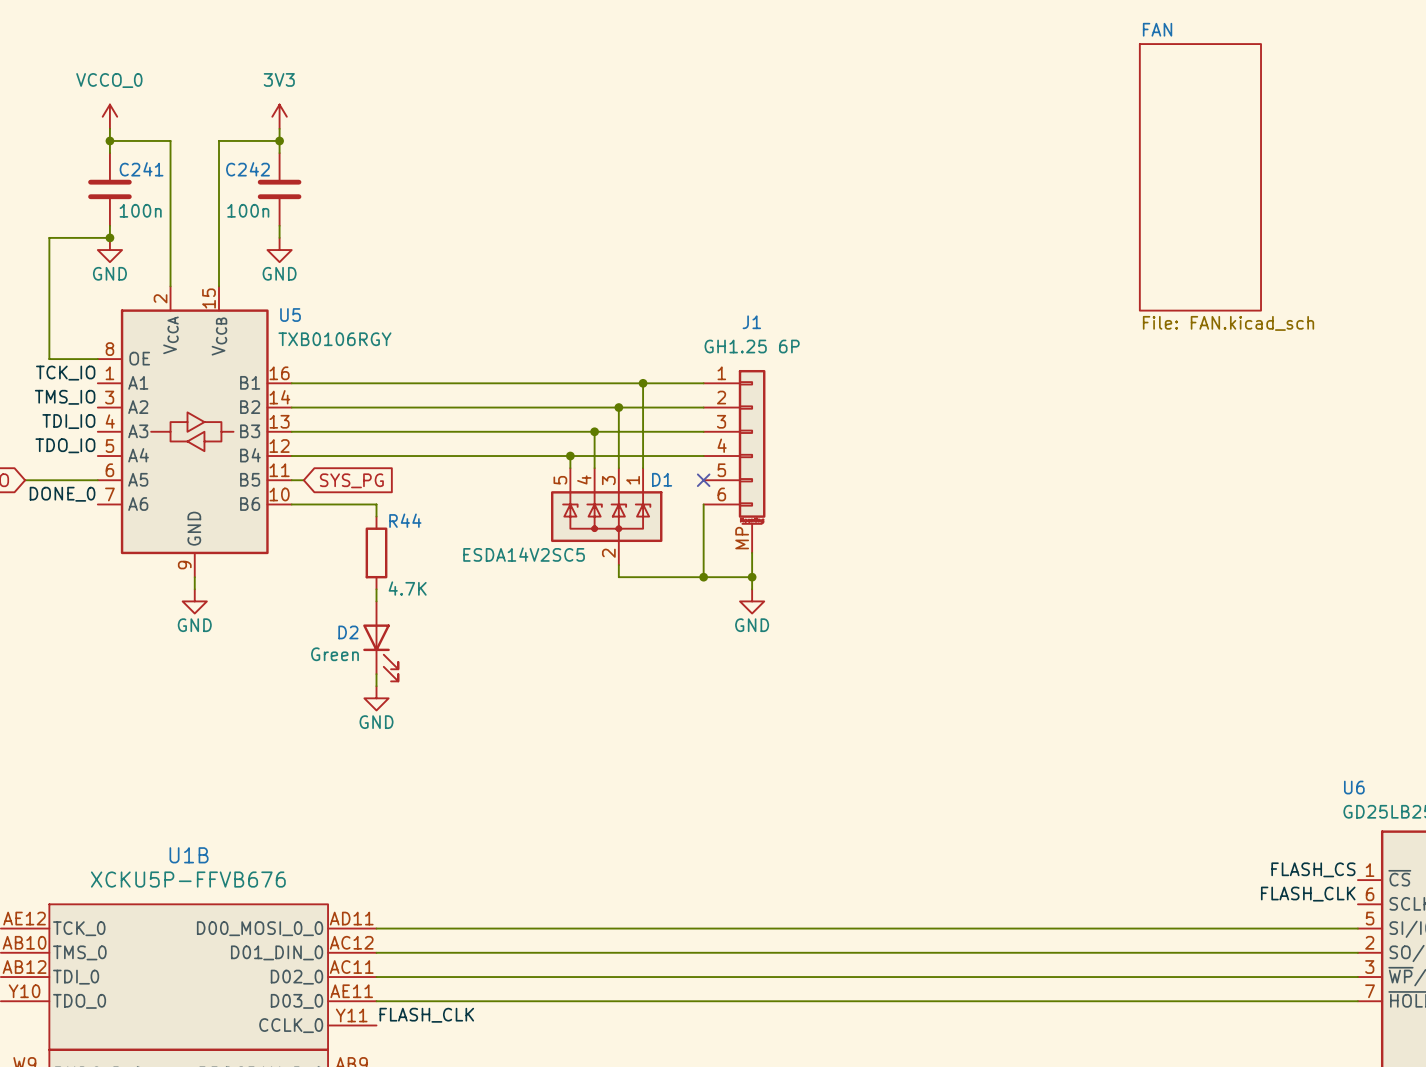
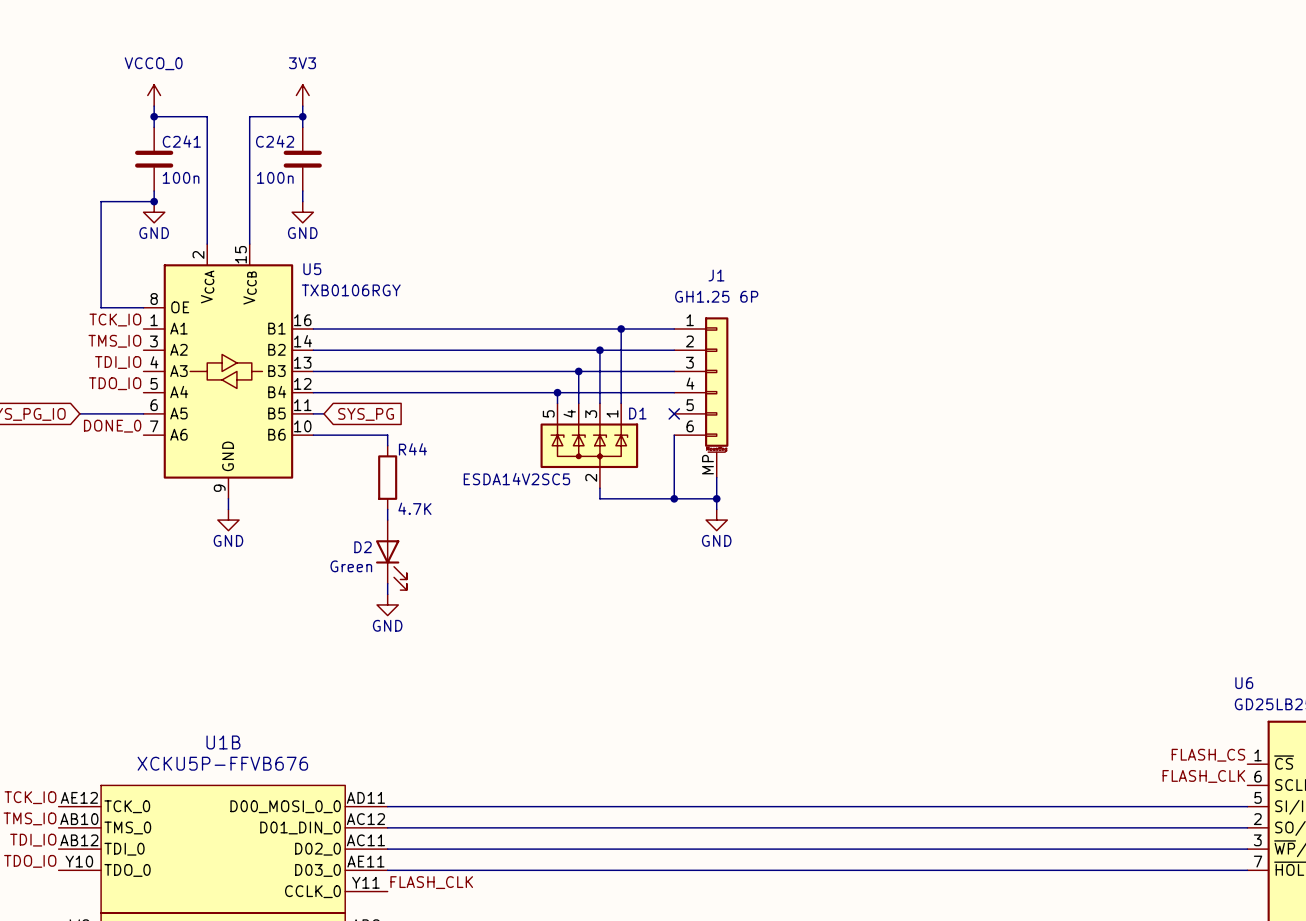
sheet FAN: File: FAN.kicad_sch (1200, 177) -> none

